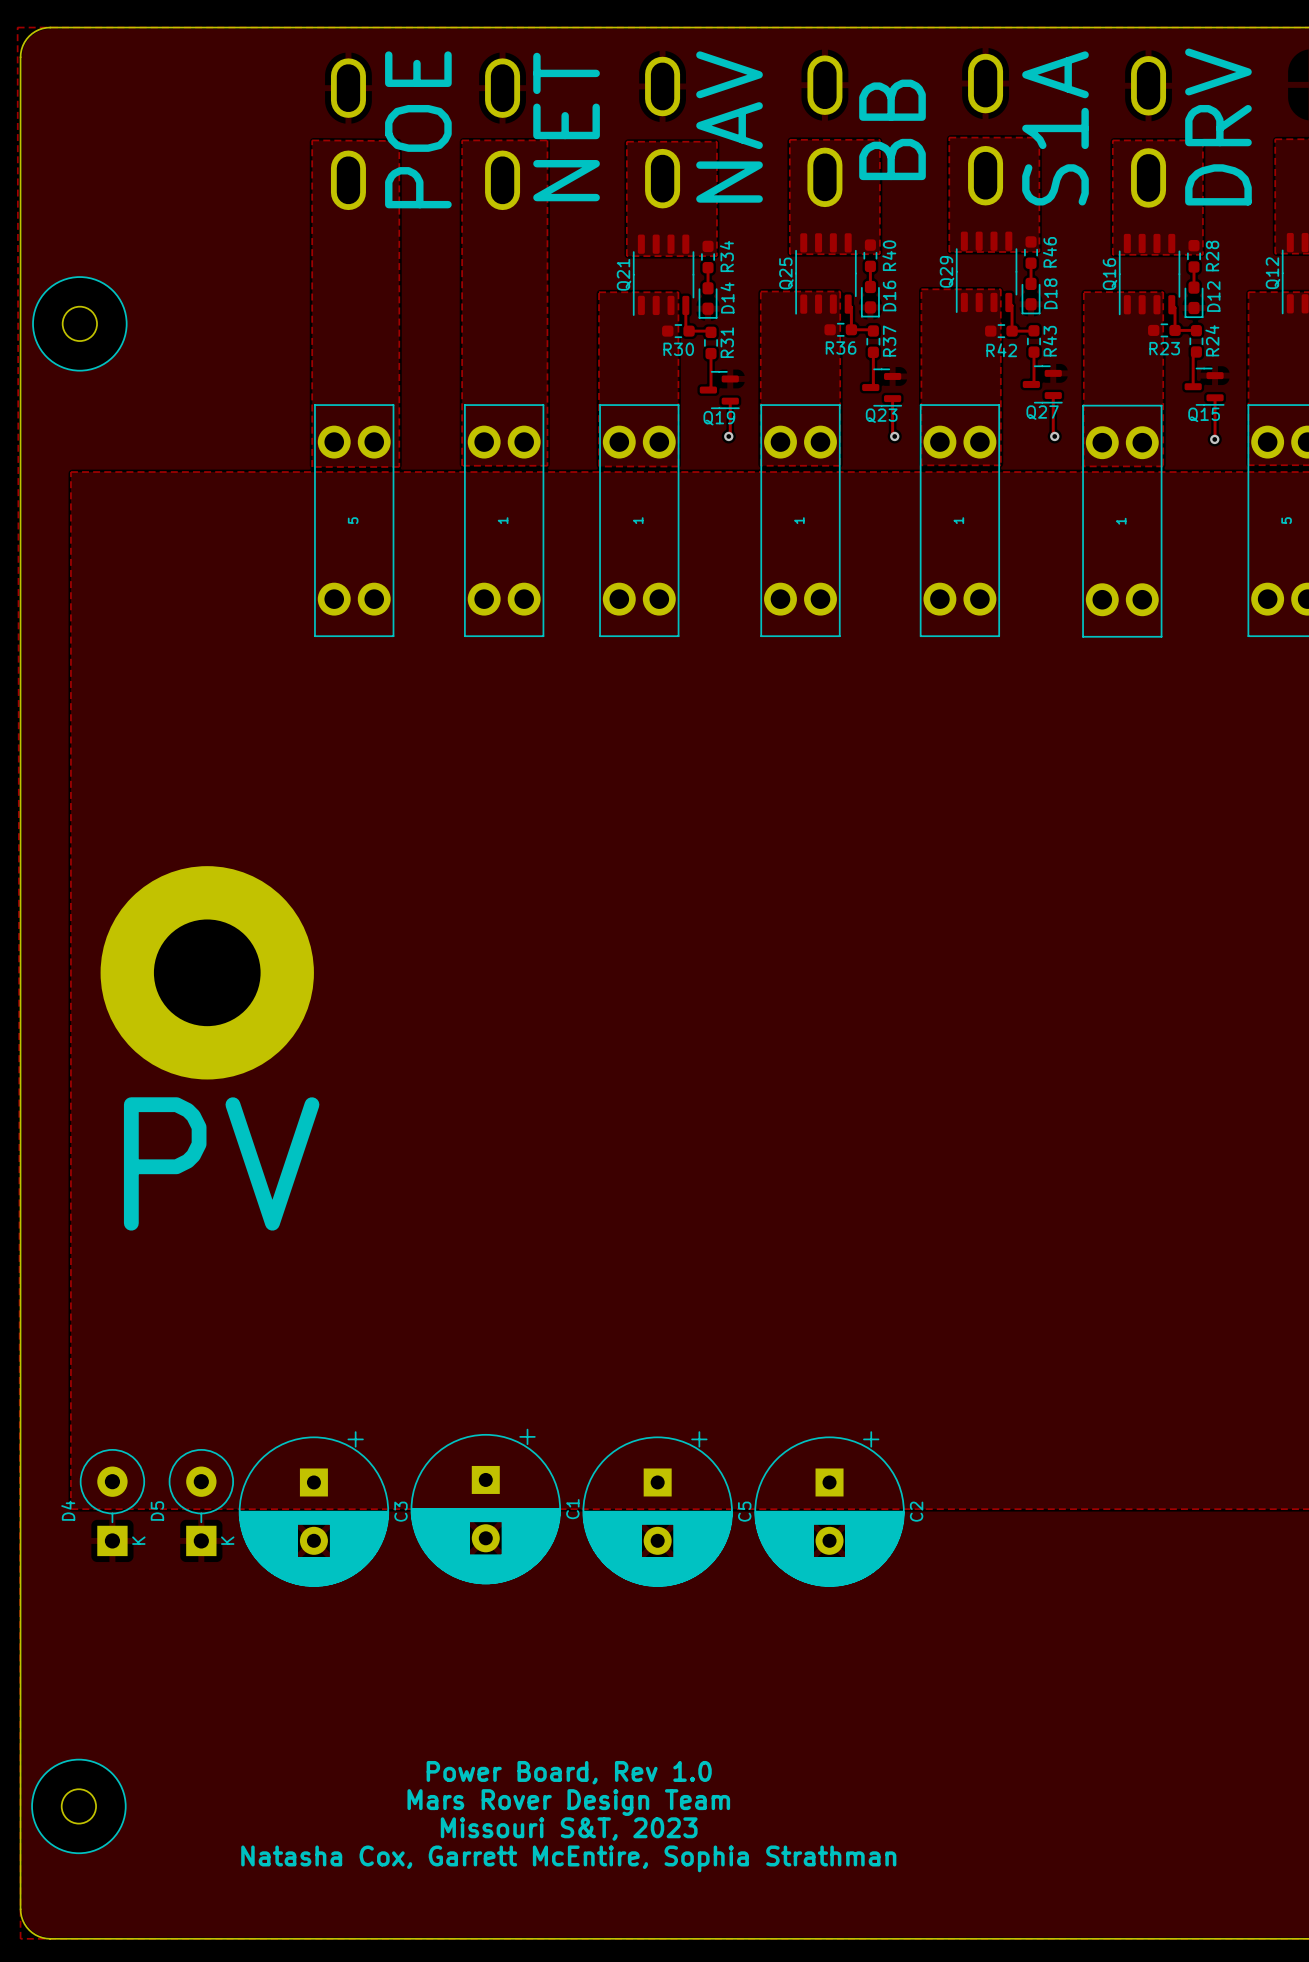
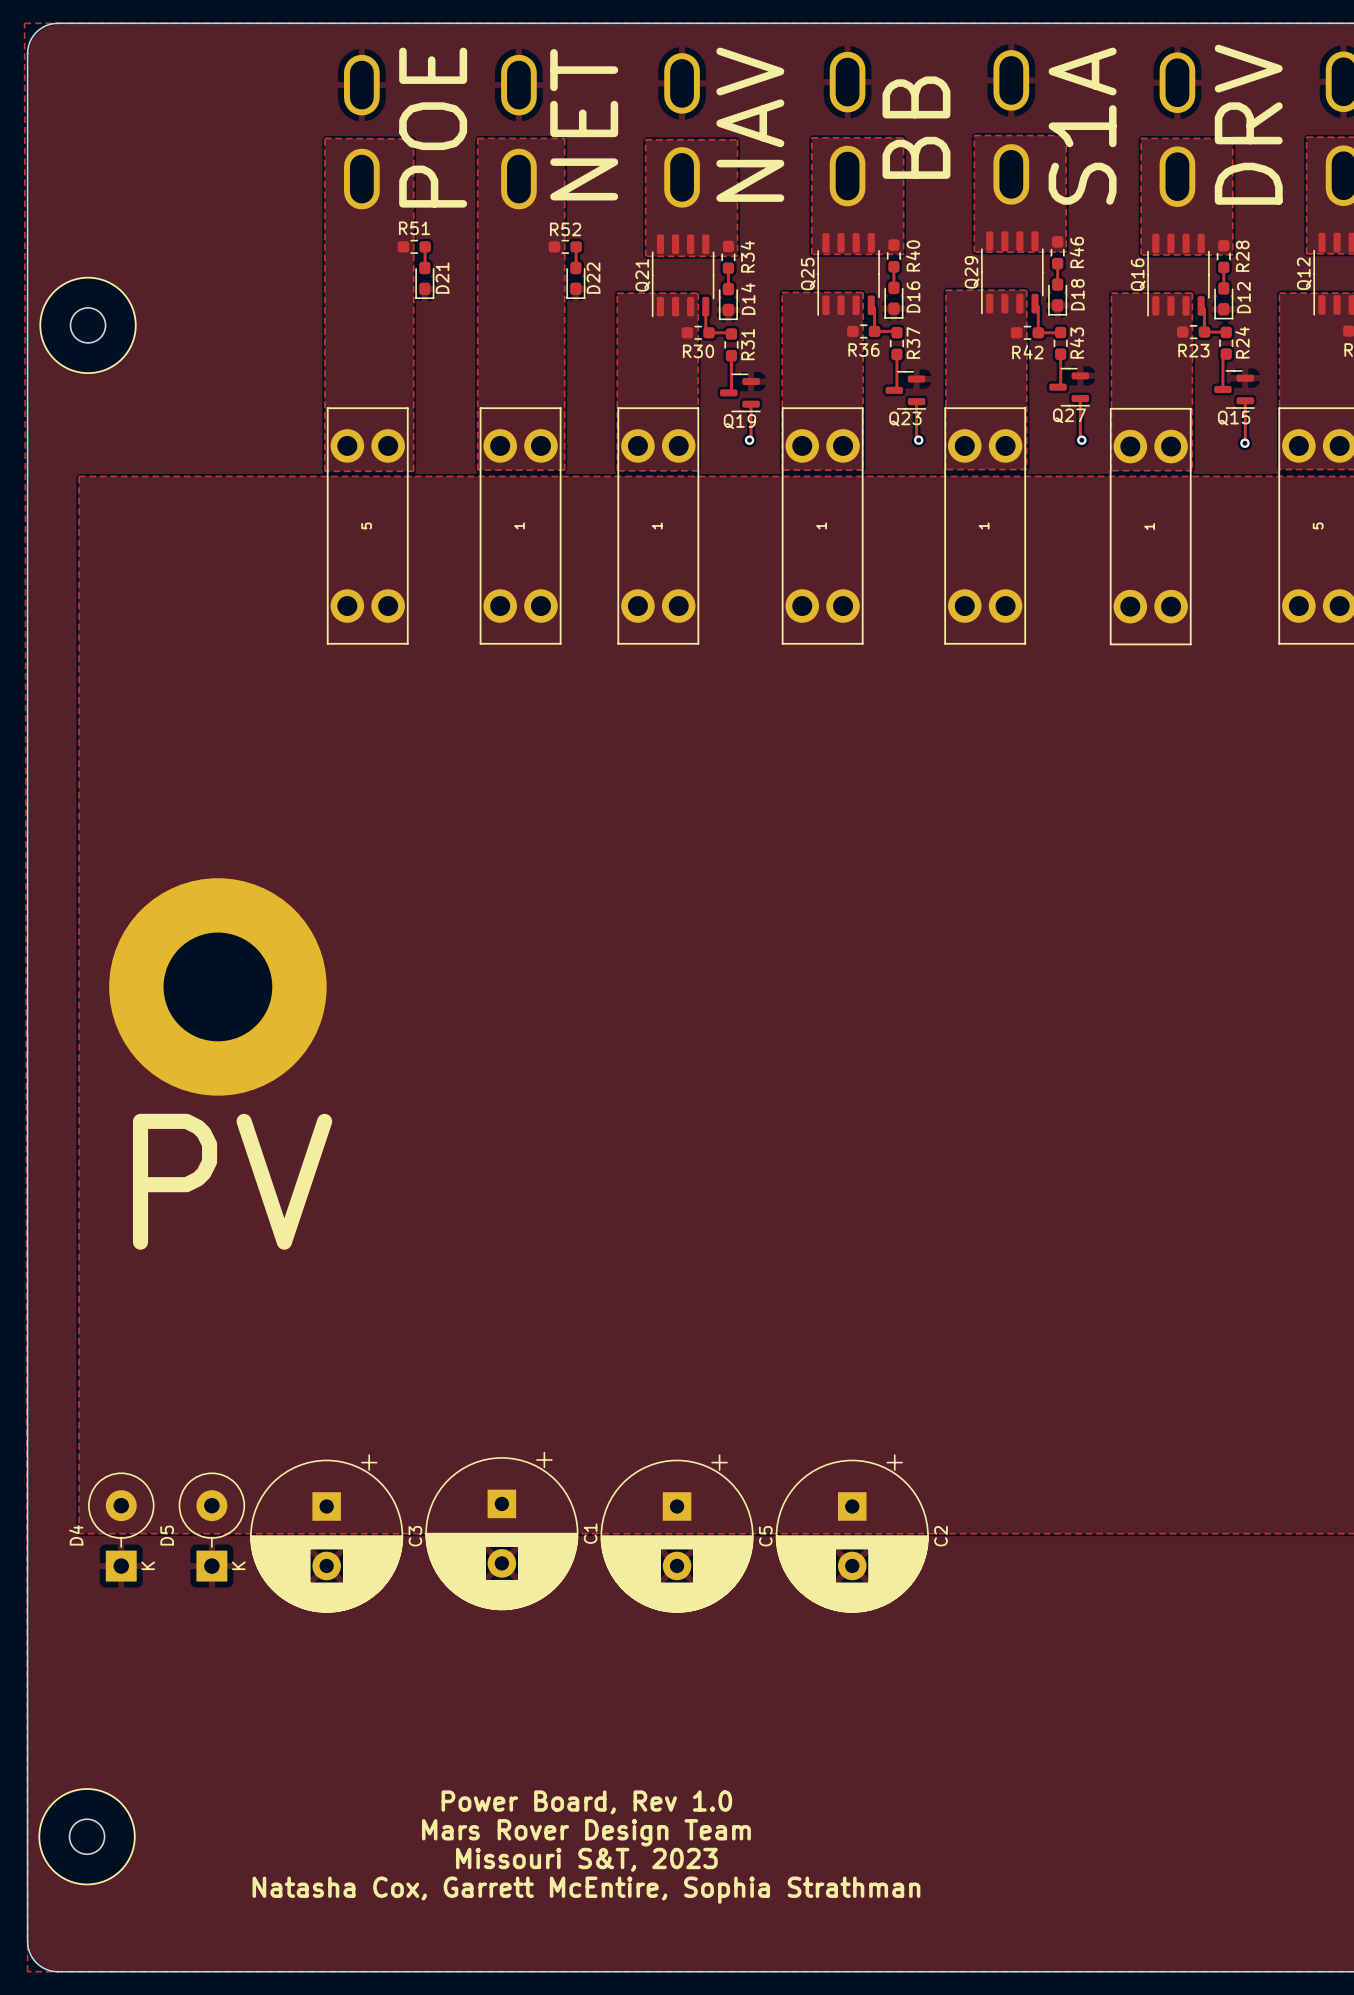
R51: none -> (414, 246)
track: none -> (425, 246) (424, 268)
R52: none -> (565, 246)
track: none -> (576, 246) (575, 268)
D21: none -> (424, 280)
D22: none -> (575, 280)

